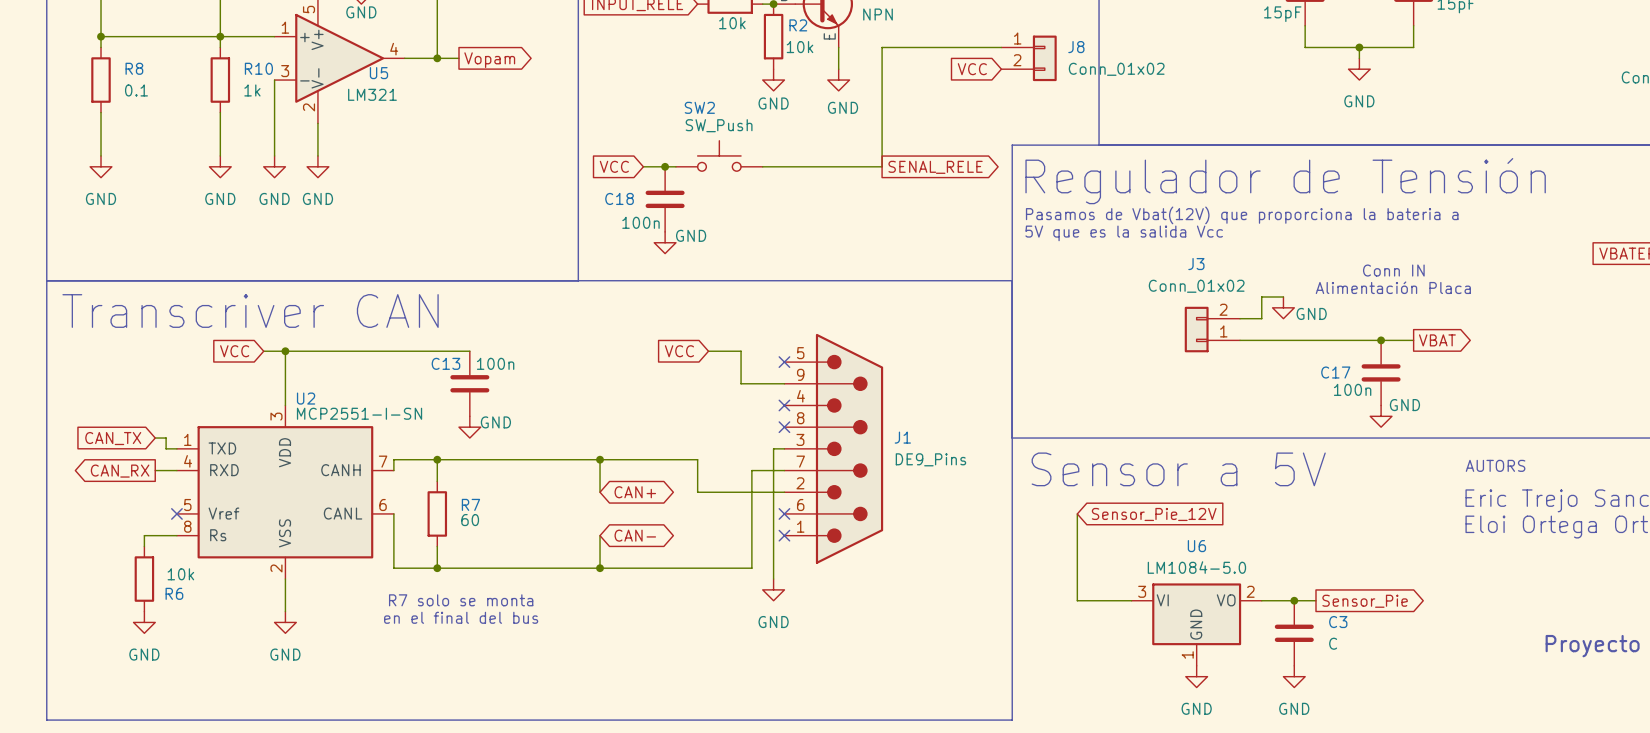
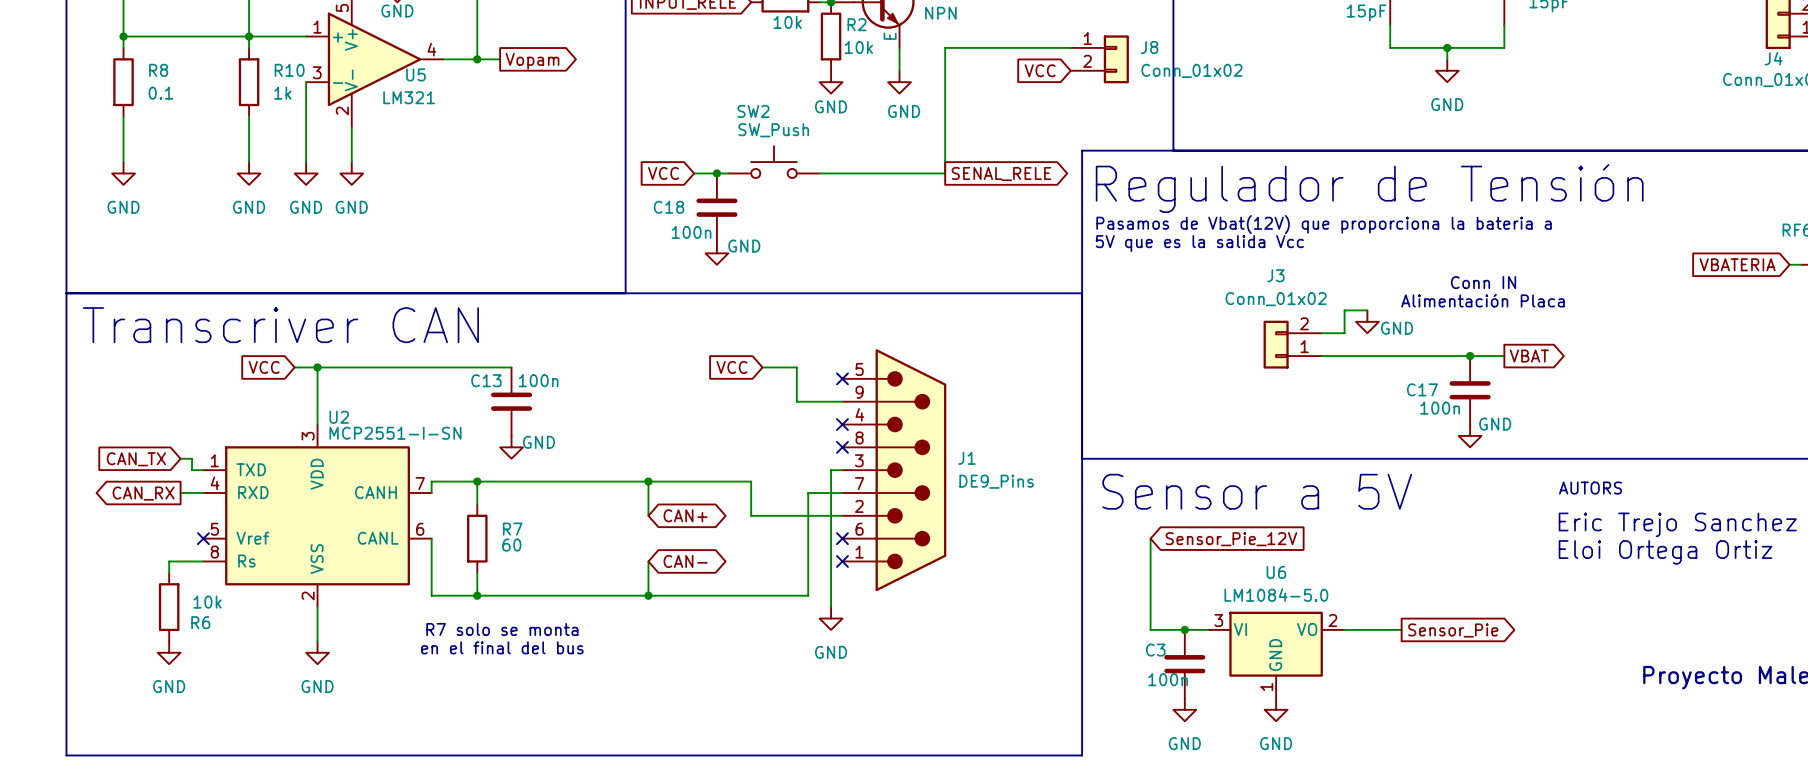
junction: none -> (1184, 629)
junction: (1294, 600) -> none
C3 name position: C3 (1338, 622) -> C3 (1155, 650)
C3 position: (1294, 633) -> (1184, 664)
C3 value: C (1333, 643) -> 100n (1168, 679)
power symbol position: GND (1294, 676) -> GND (1184, 709)

